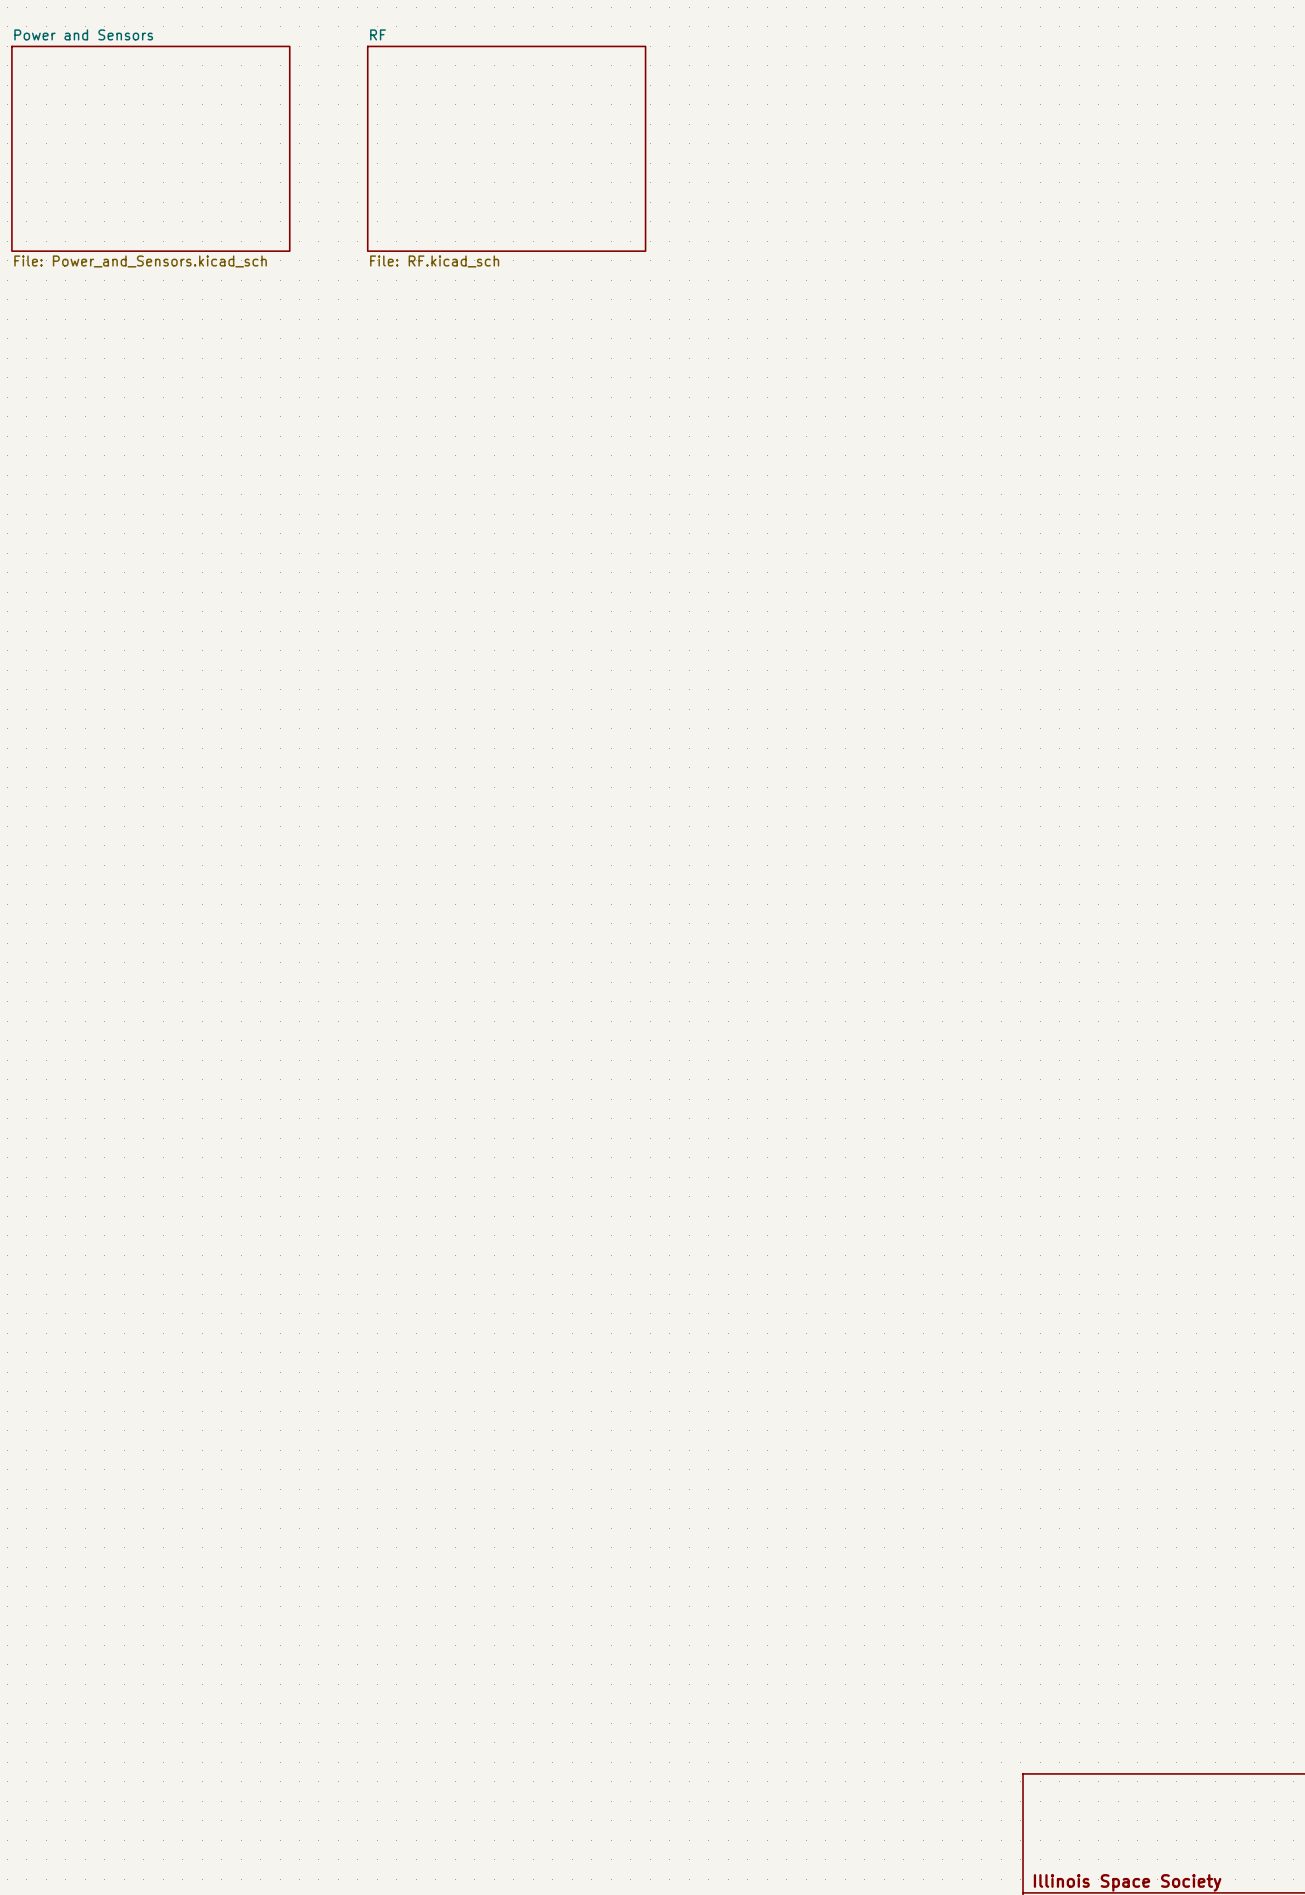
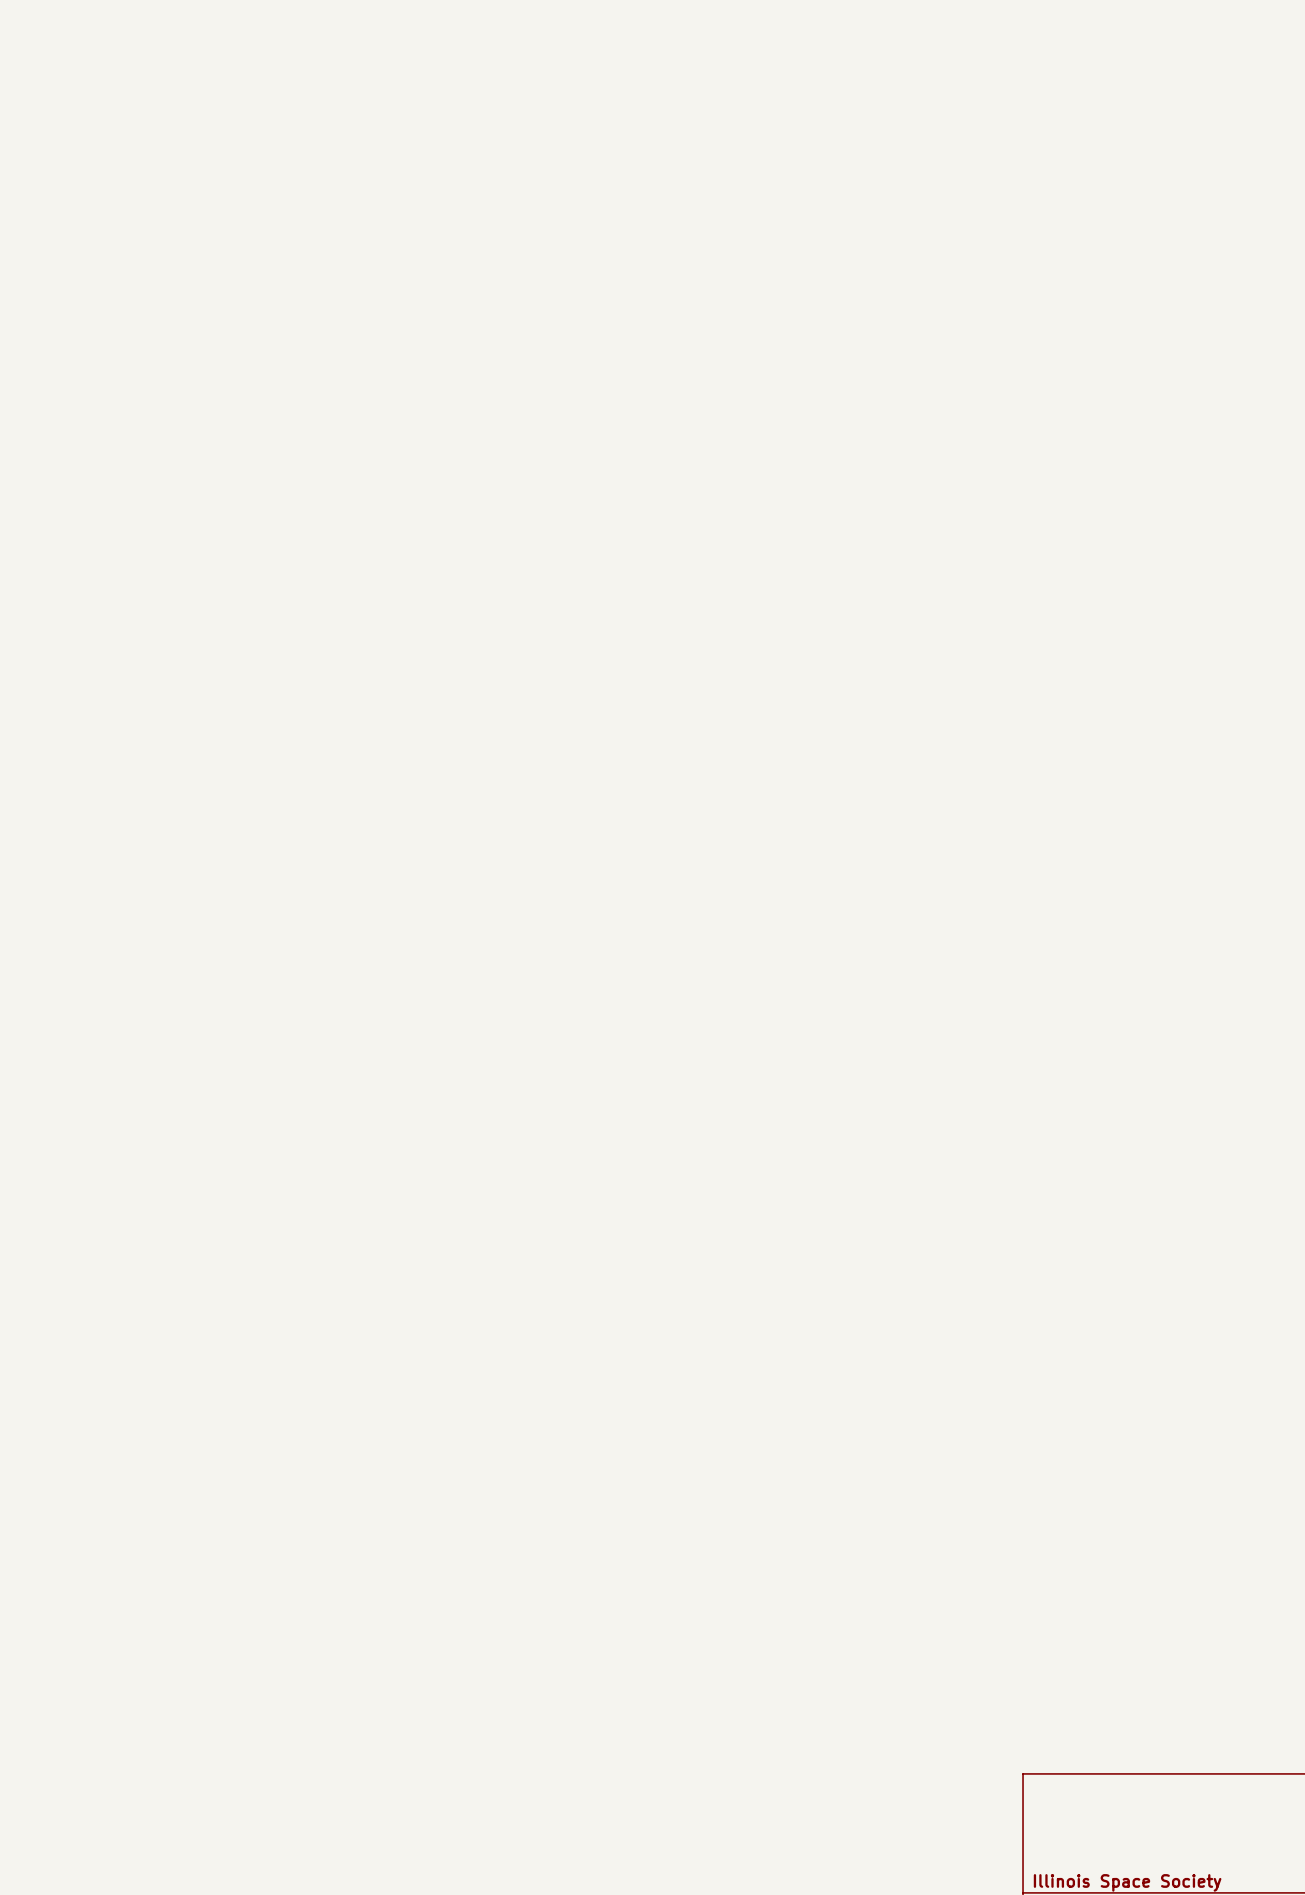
sheet Power and Sensors: File: Power_and_Sensors.kicad_sch (150, 148) -> none
sheet RF: File: RF.kicad_sch (506, 148) -> none

